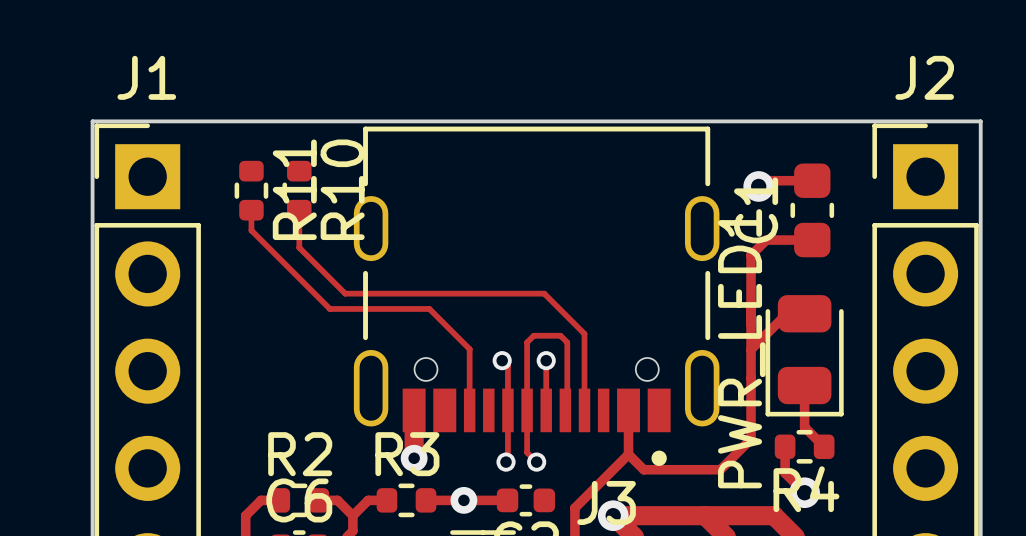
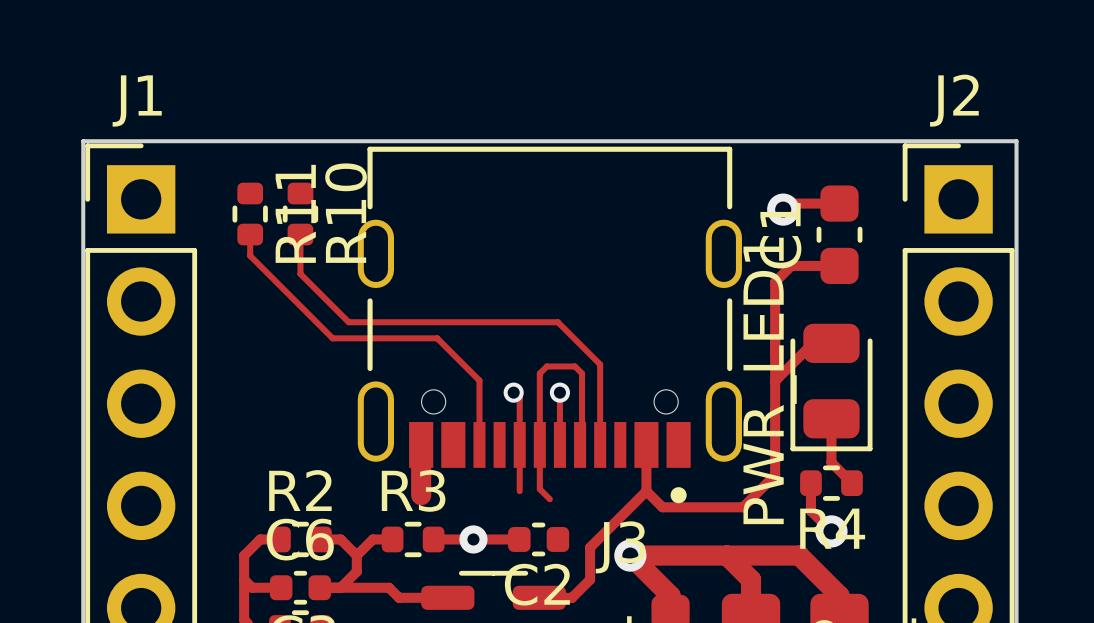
via: (414, 458) -> none
via: (506, 462) -> none
via: (536, 462) -> none

